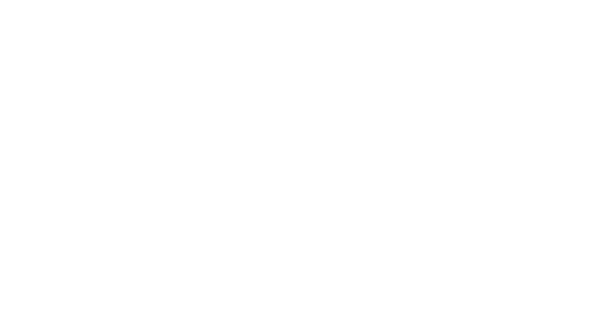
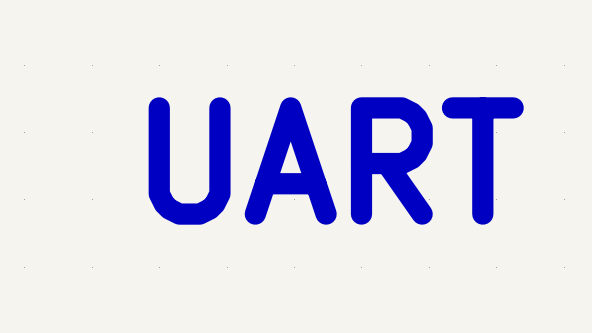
text: none -> UART (336, 160)

